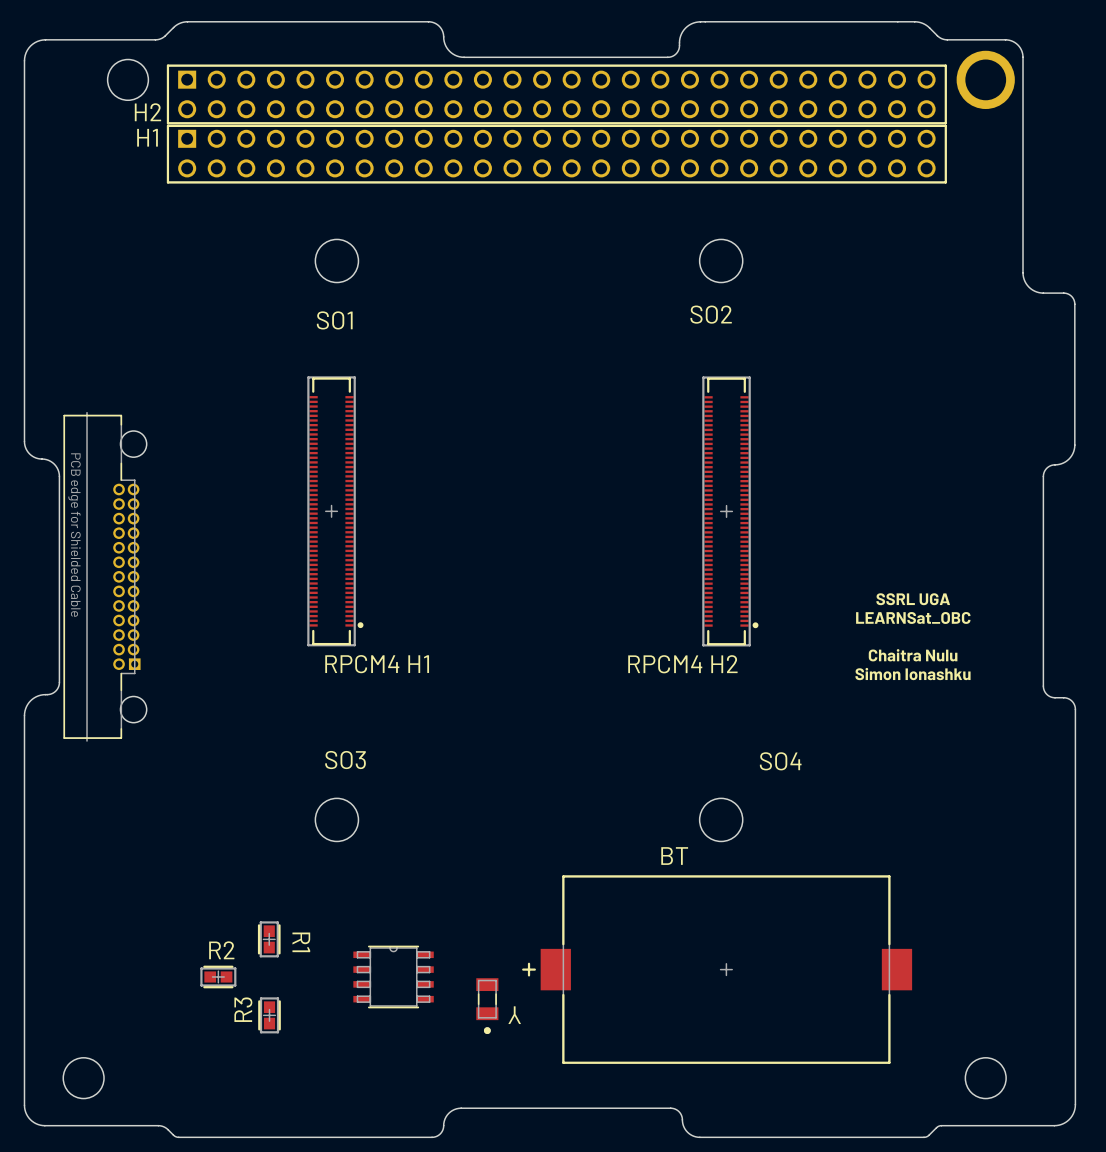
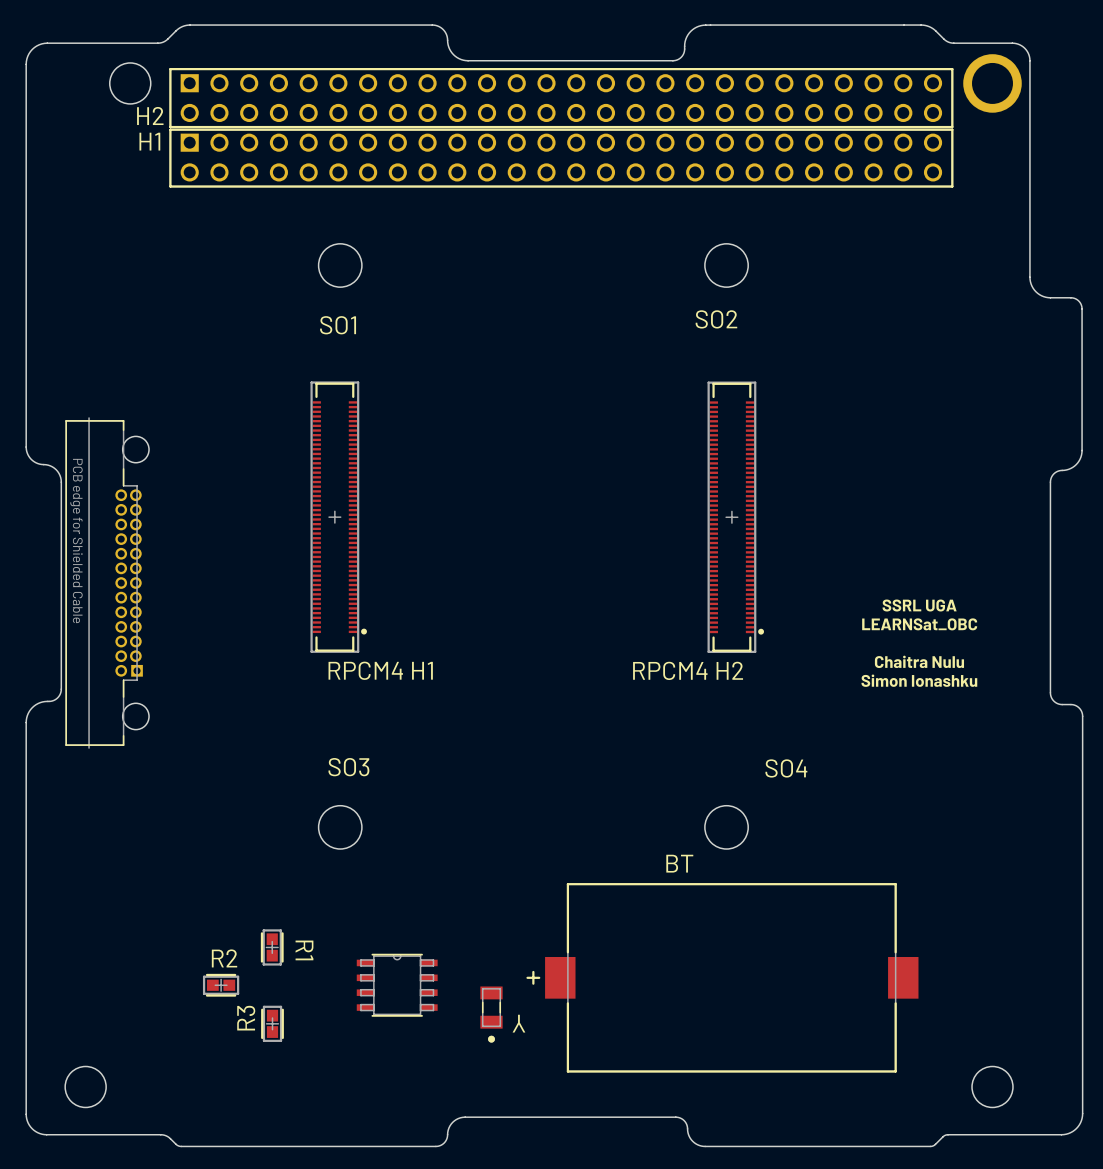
BT footprint: [522, 875, 913, 1064] -> [526, 883, 919, 1073]

